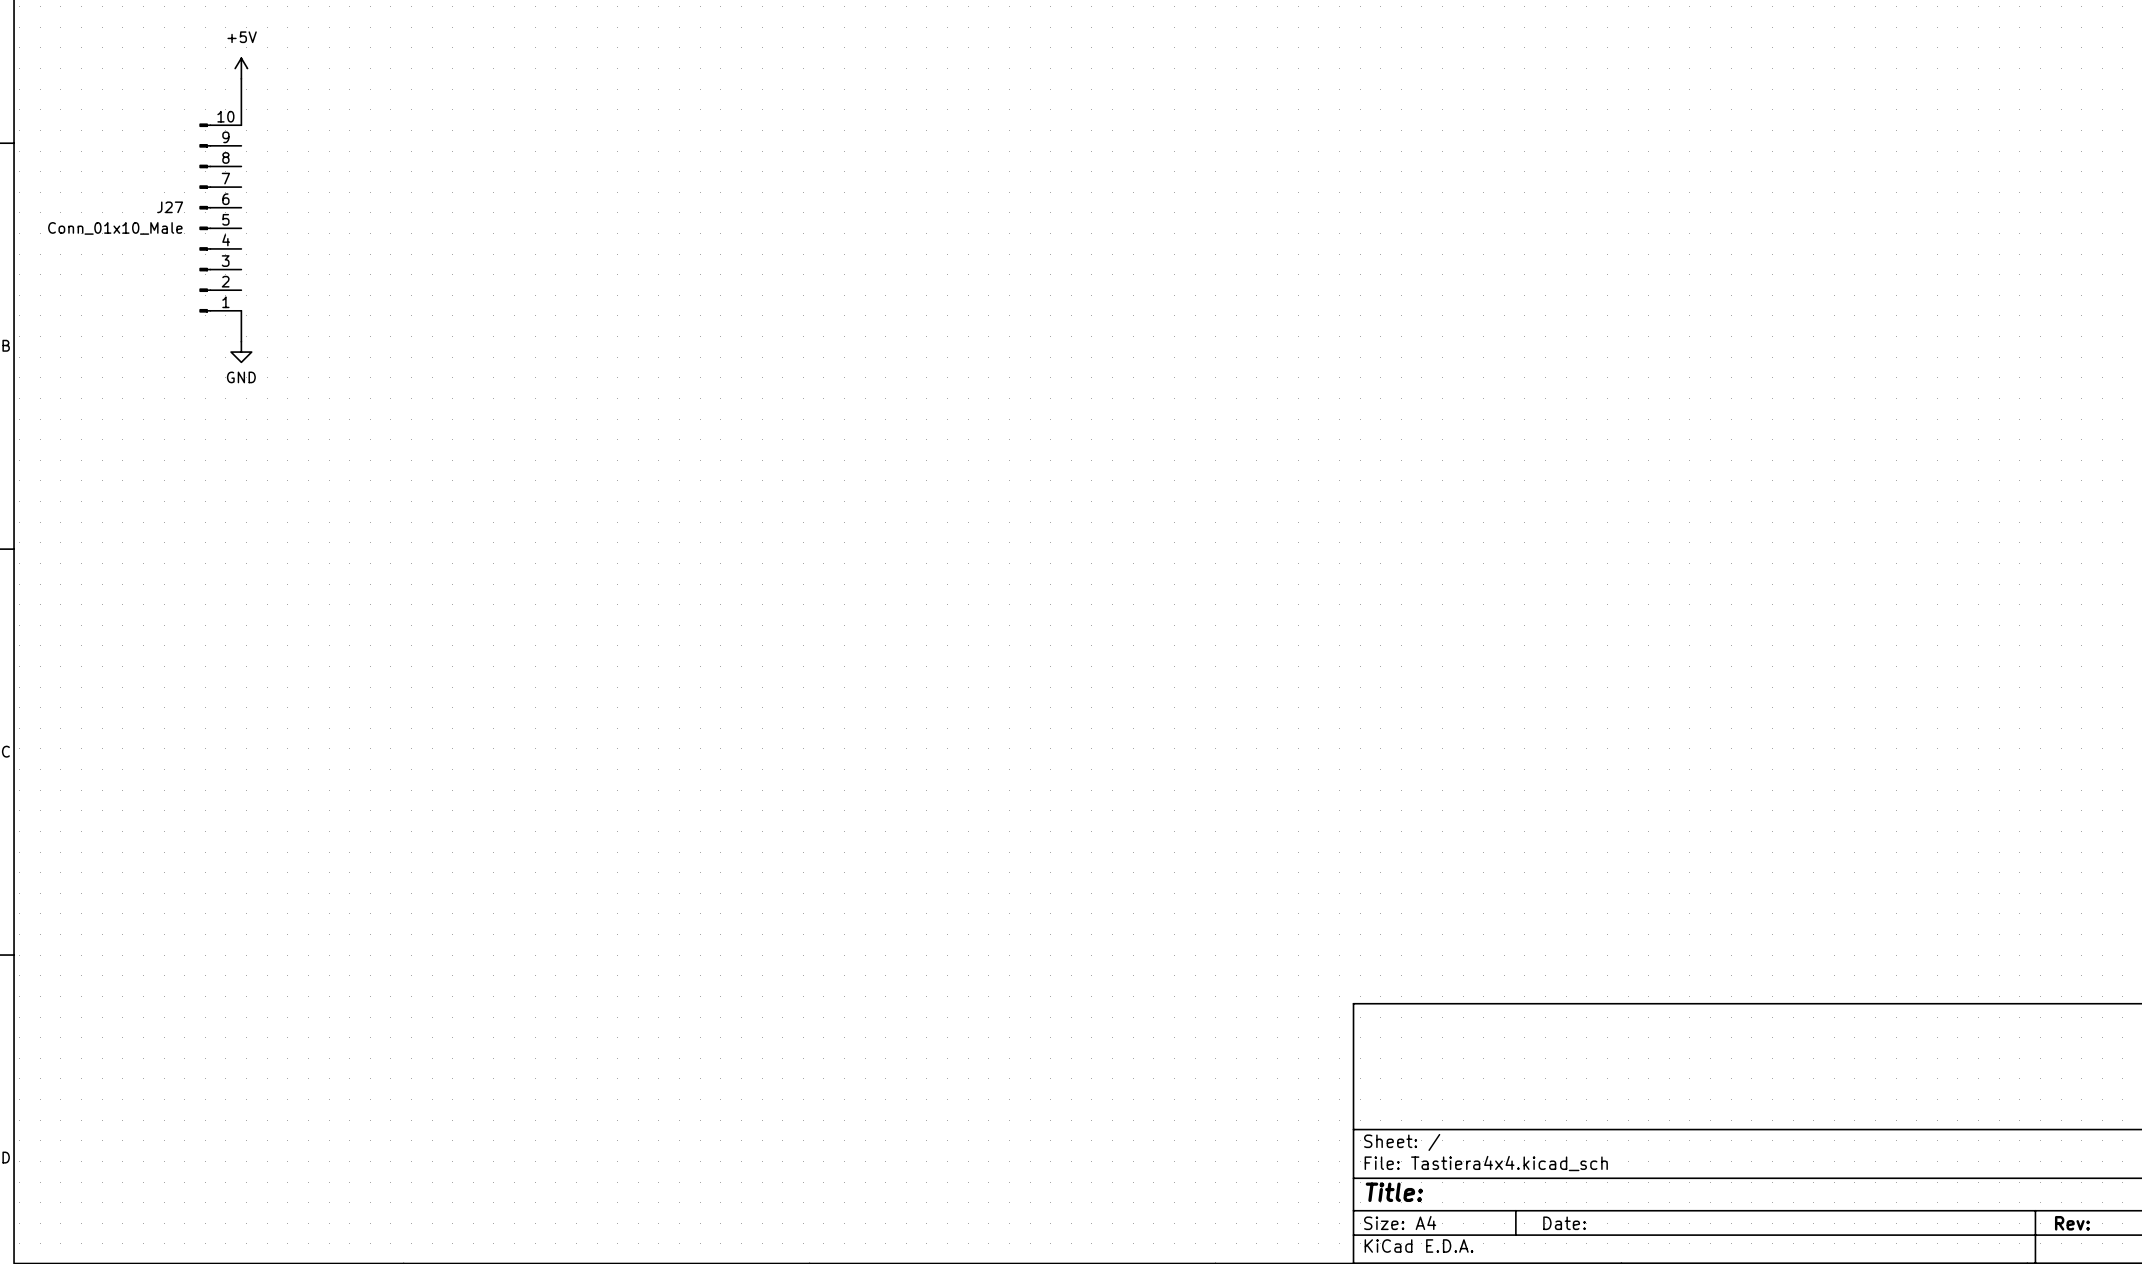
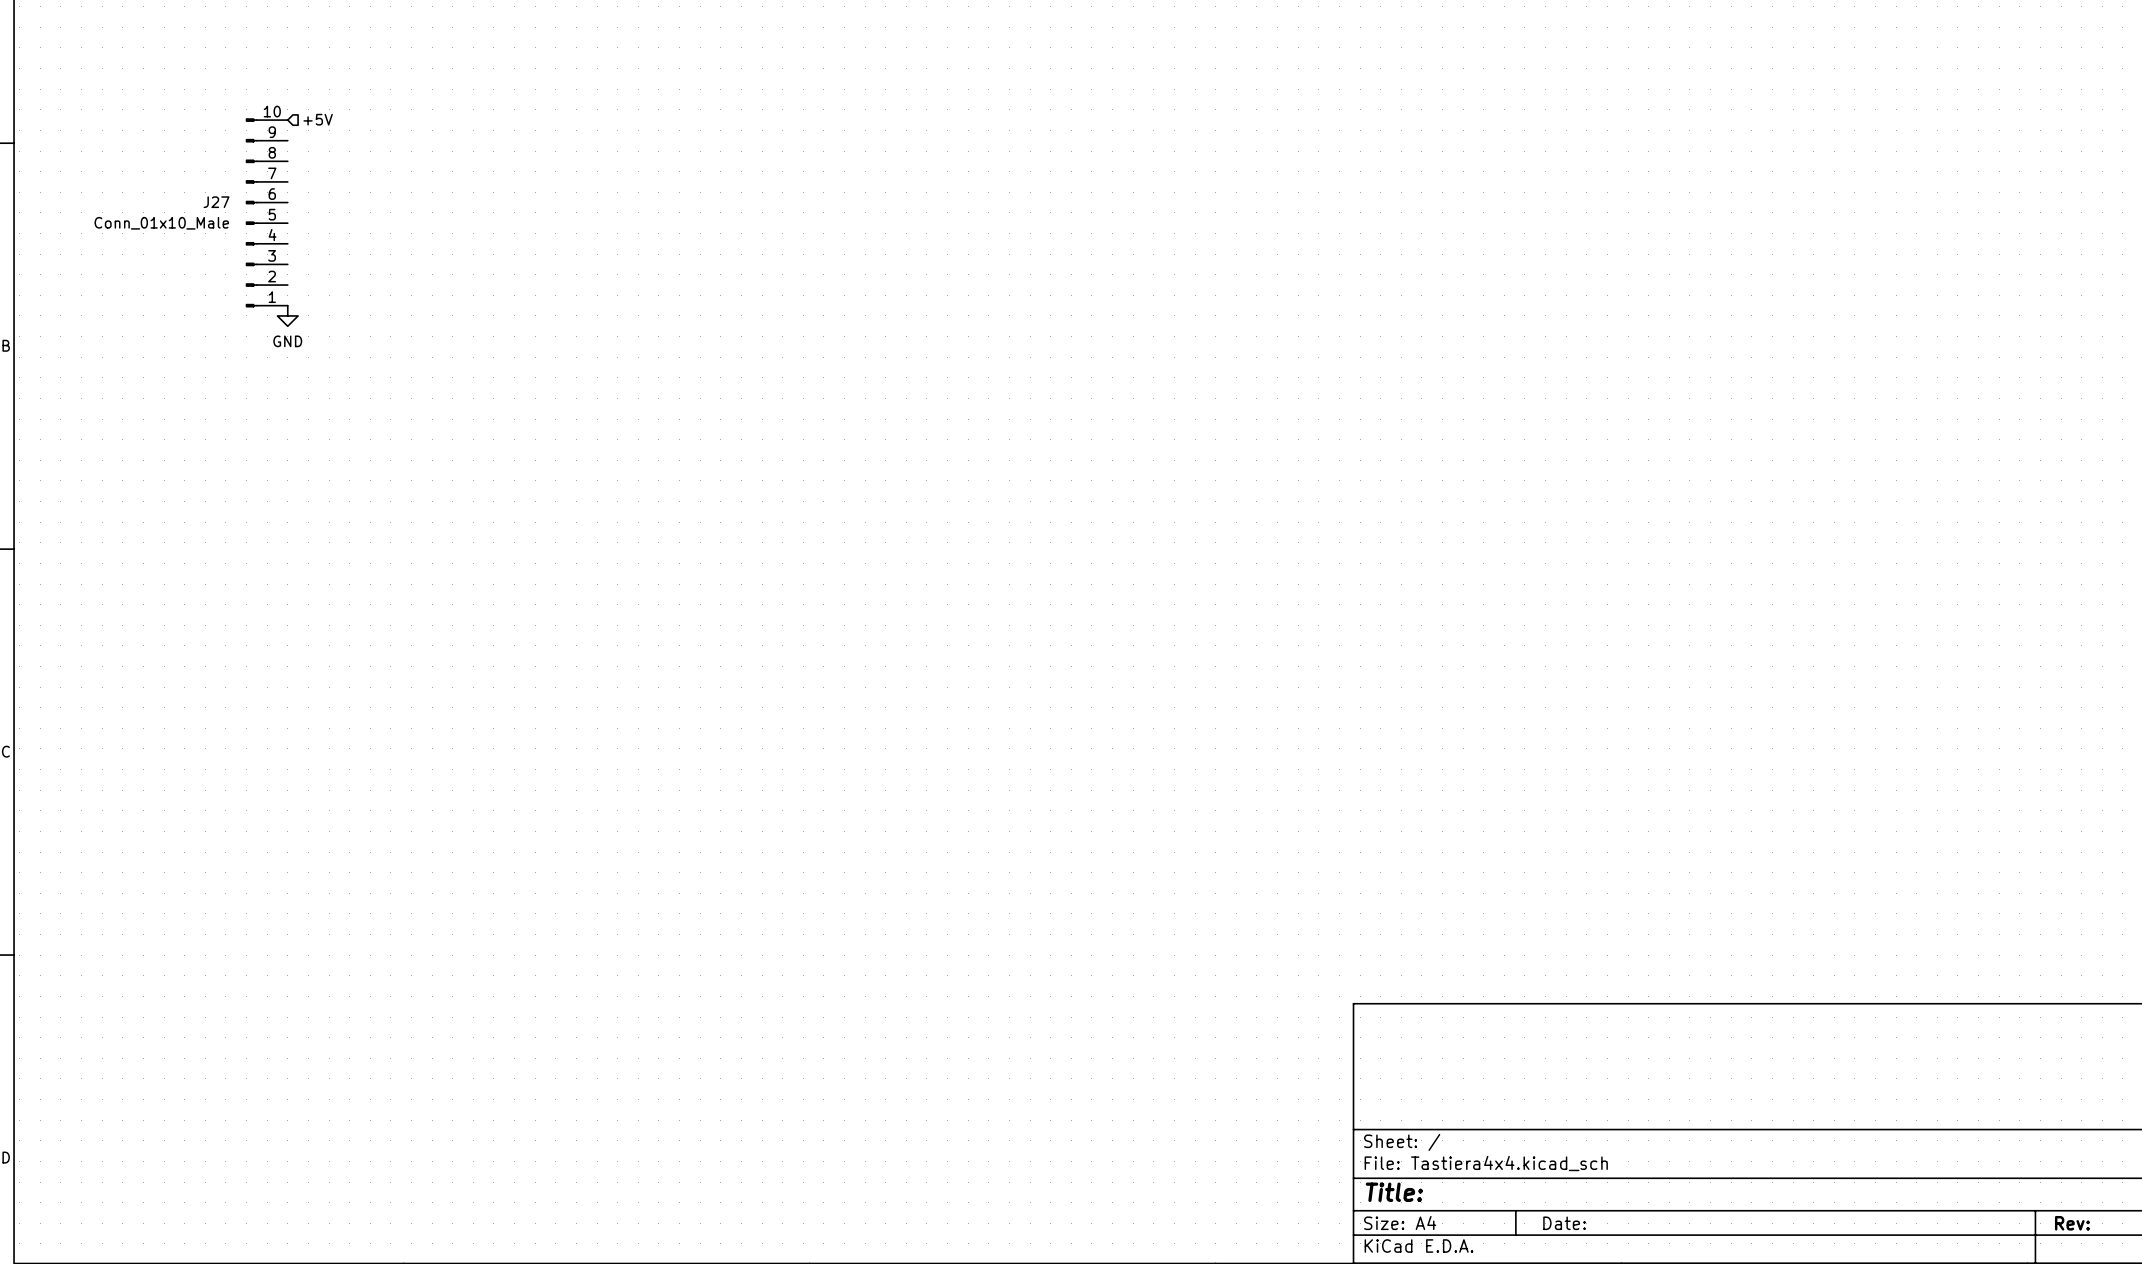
power symbol: +5V (241, 68) -> none
wire: (241, 78) (241, 125) -> none
hierarchical label: none -> +5V (318, 119)
J27 position: (220, 218) -> (266, 212)
wire: (241, 310) (241, 341) -> none
power symbol position: GND (241, 352) -> GND (287, 315)

